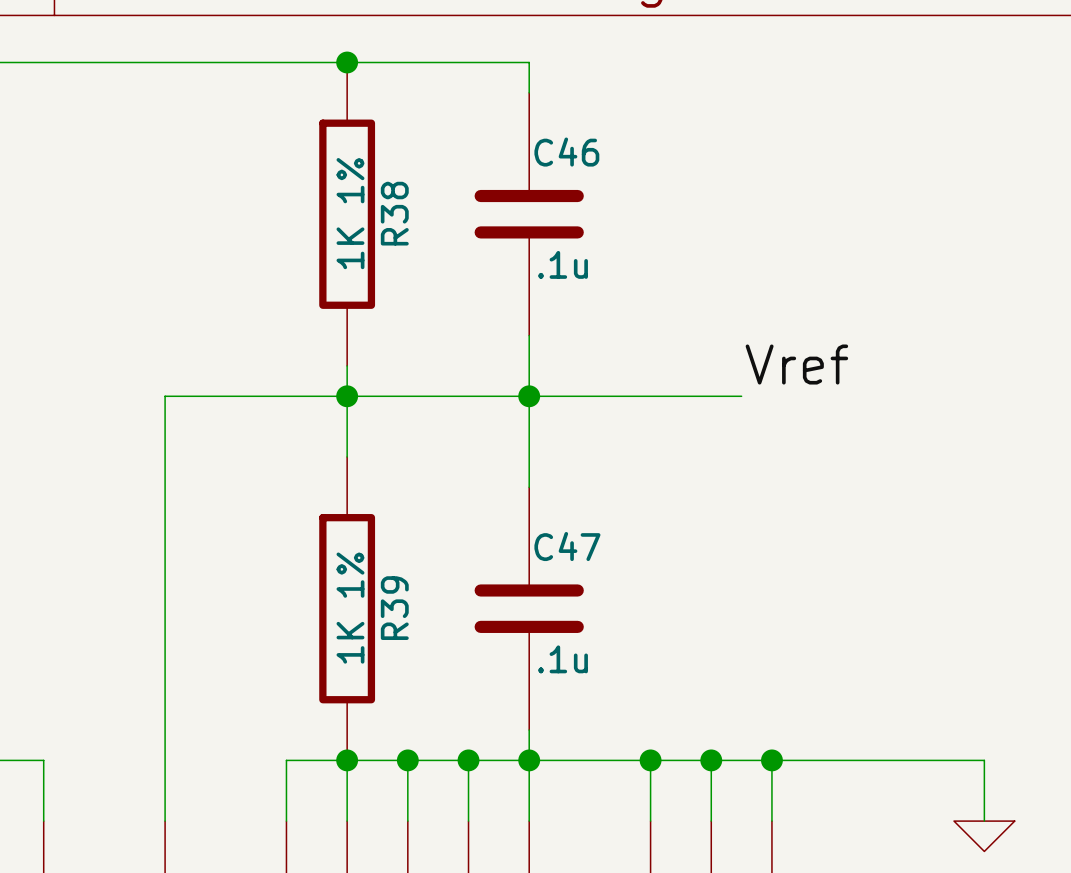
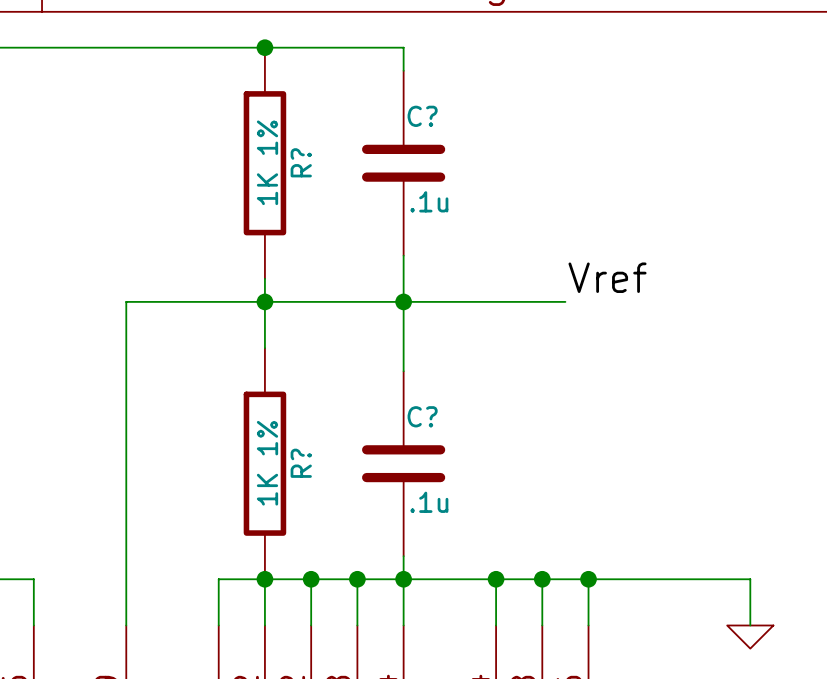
C46 name: C46 (566, 152) -> C? (422, 116)
R38 name: R38 (394, 213) -> R? (301, 162)
C47 name: C47 (567, 546) -> C? (422, 416)
R39 name: R39 (394, 608) -> R? (301, 463)

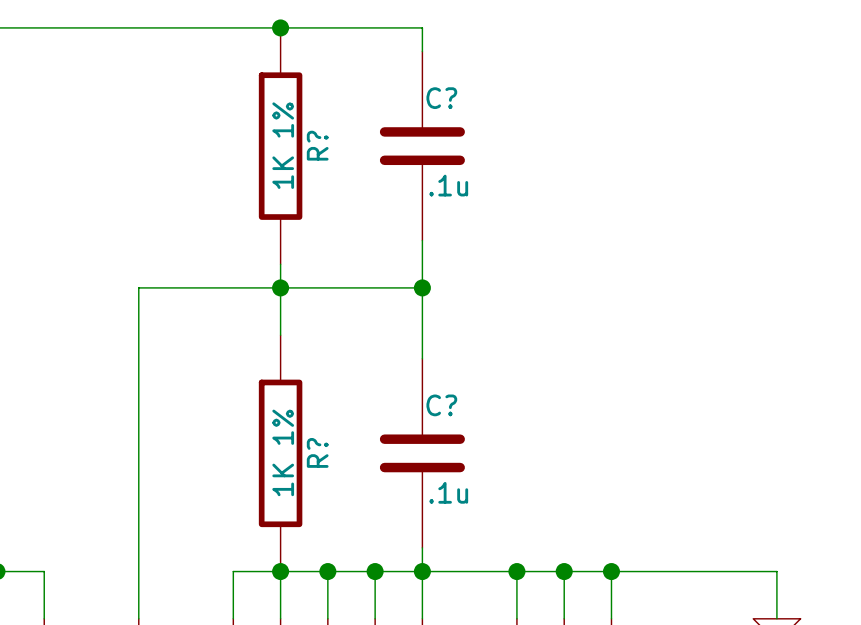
label: Vref (607, 277) -> none
wire: (403, 301) (565, 301) -> none

